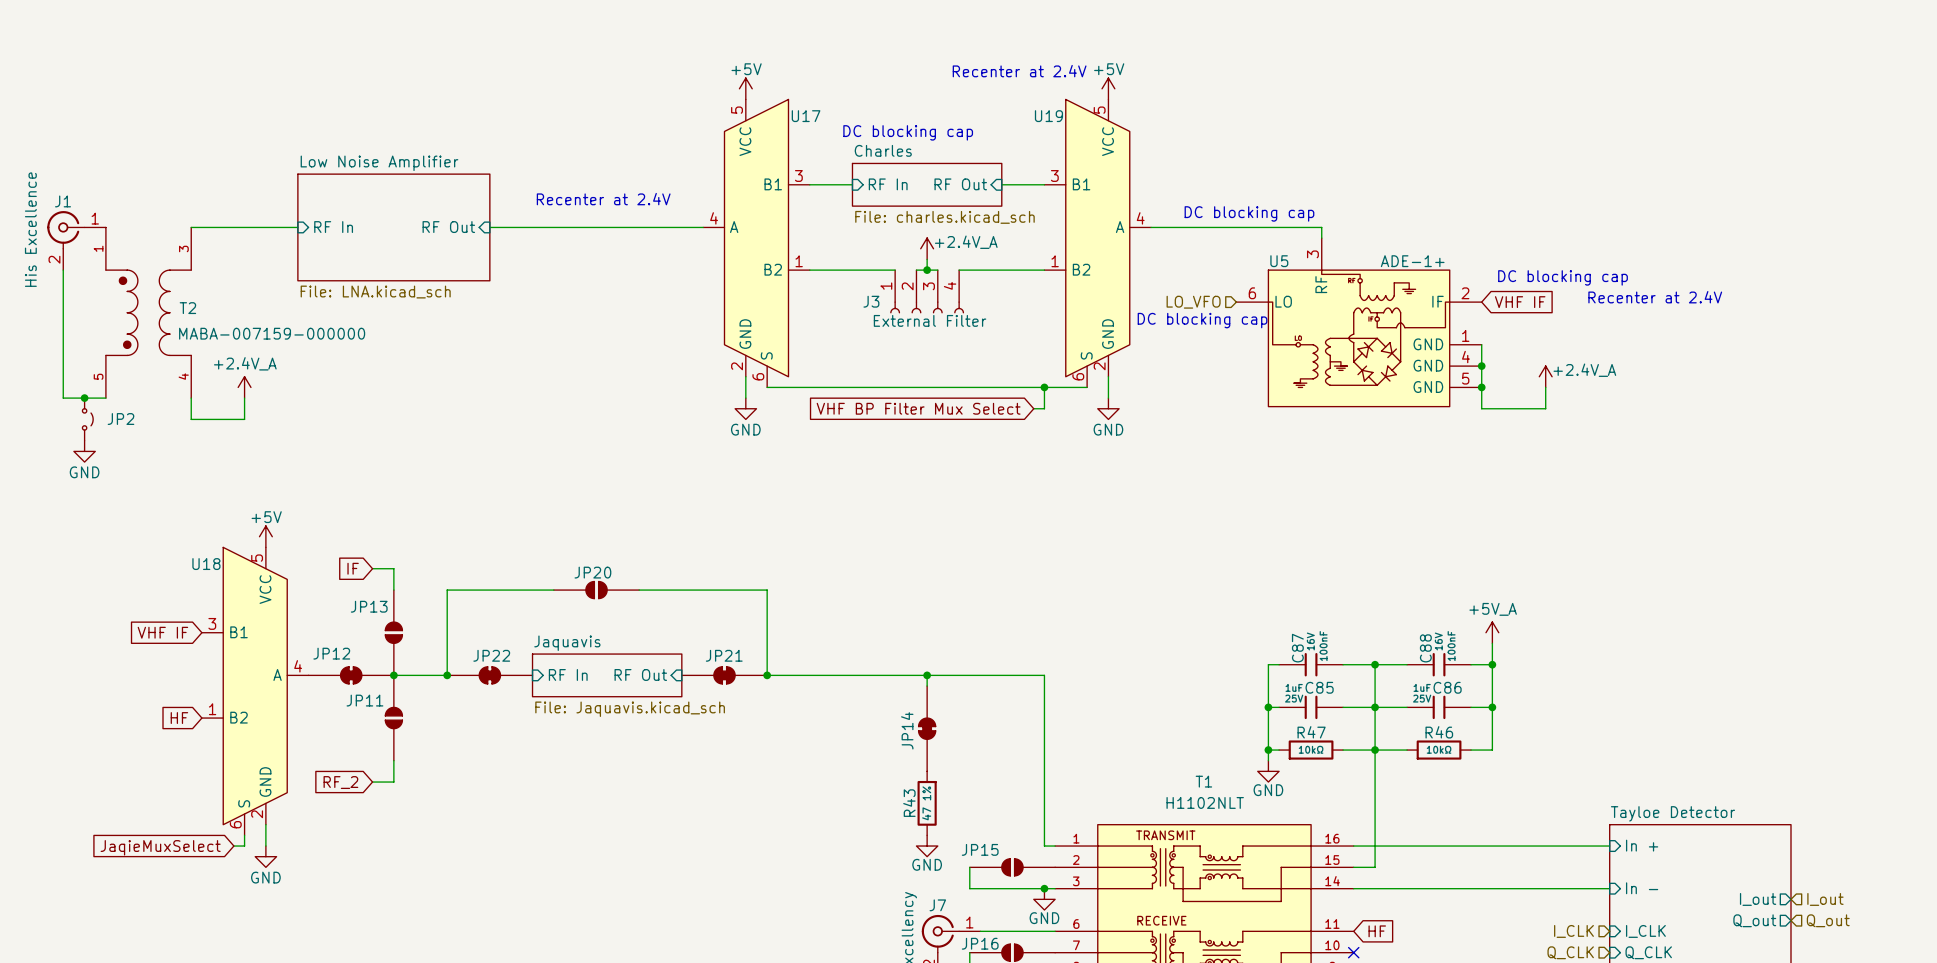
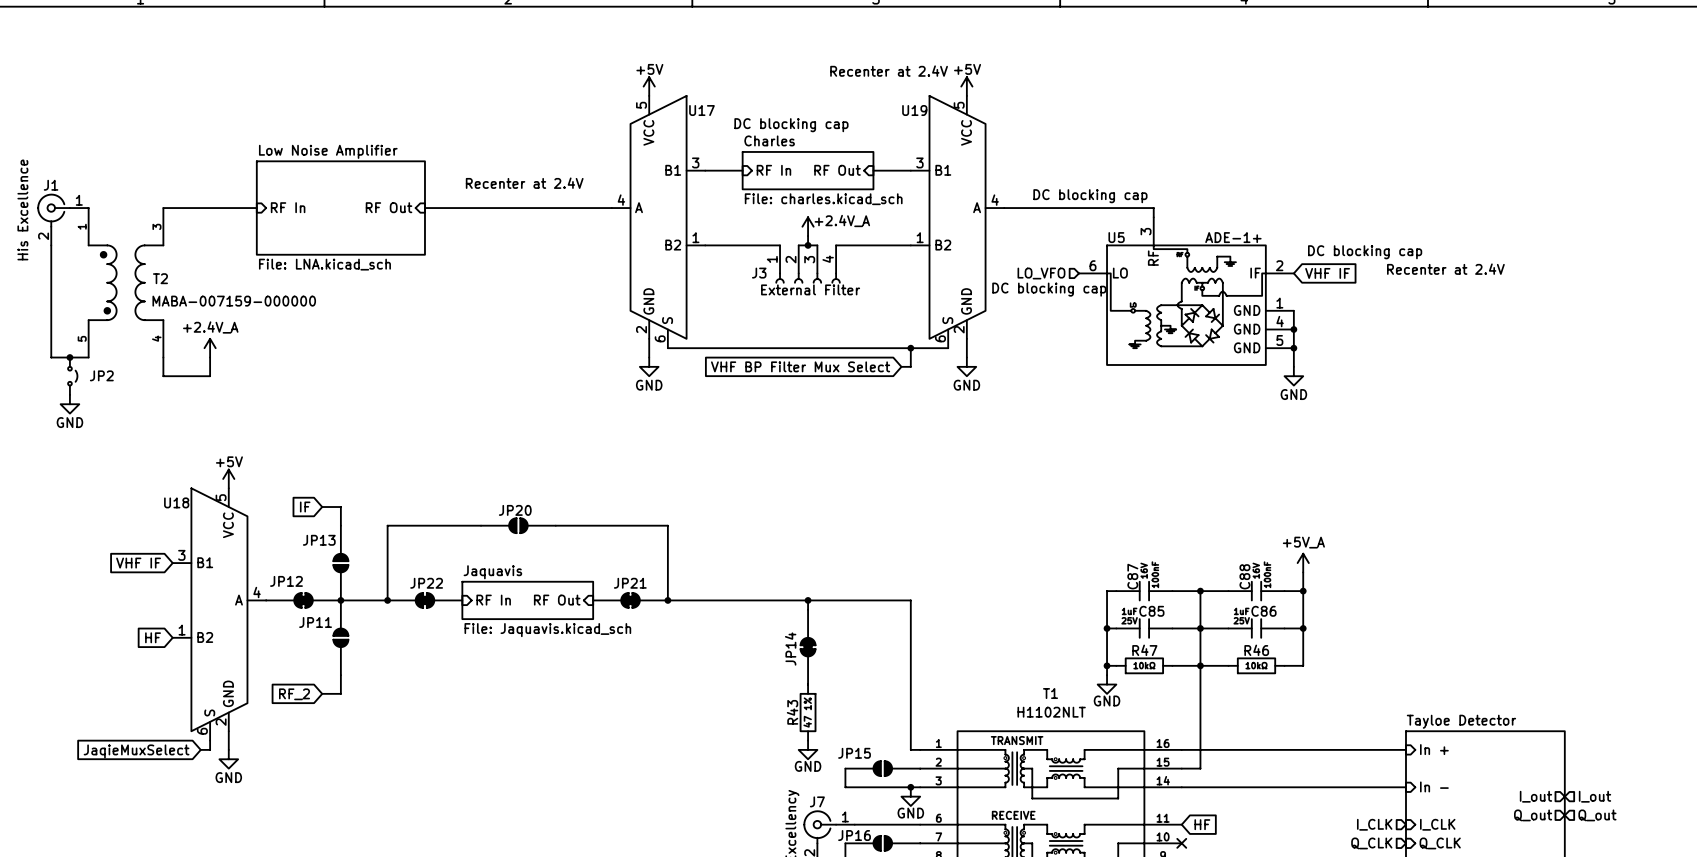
power symbol: +2.4V_A (1545, 376) -> none
wire: (1545, 387) (1545, 408) (1481, 408) -> none
power symbol: none -> GND (1293, 376)

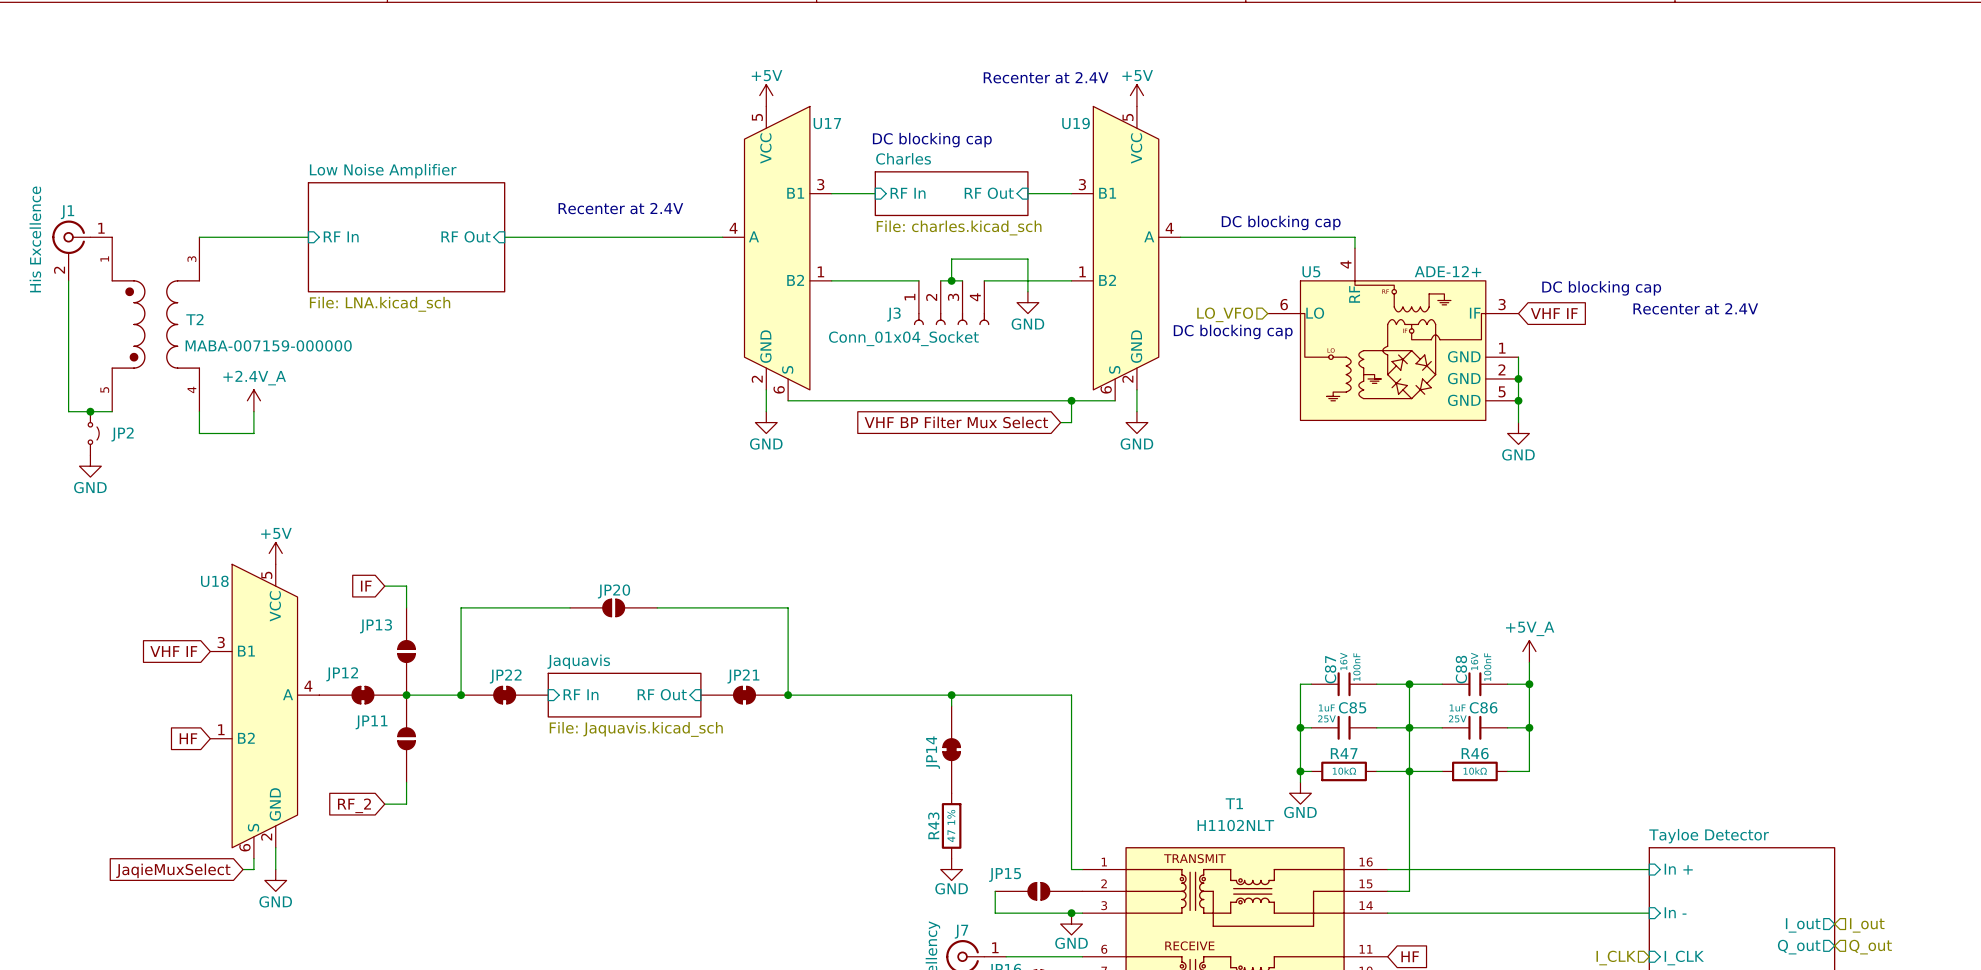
power symbol: +2.4V_A (808, 226) -> none
U5 pin number: 3 (1146, 231) -> 4 (1345, 264)
wire: none -> (951, 269) (951, 259) (1027, 259) (1027, 291)
U5 value: ADE-1+ (1233, 237) -> ADE-12+ (1448, 271)
power symbol: none -> GND (1027, 302)
U5 pin number: 2 (1279, 265) -> 3 (1502, 304)
J3 value: External Filter (810, 289) -> Conn_01x04_Socket (903, 338)
U5 pin number: 4 (1280, 321) -> 2 (1501, 369)

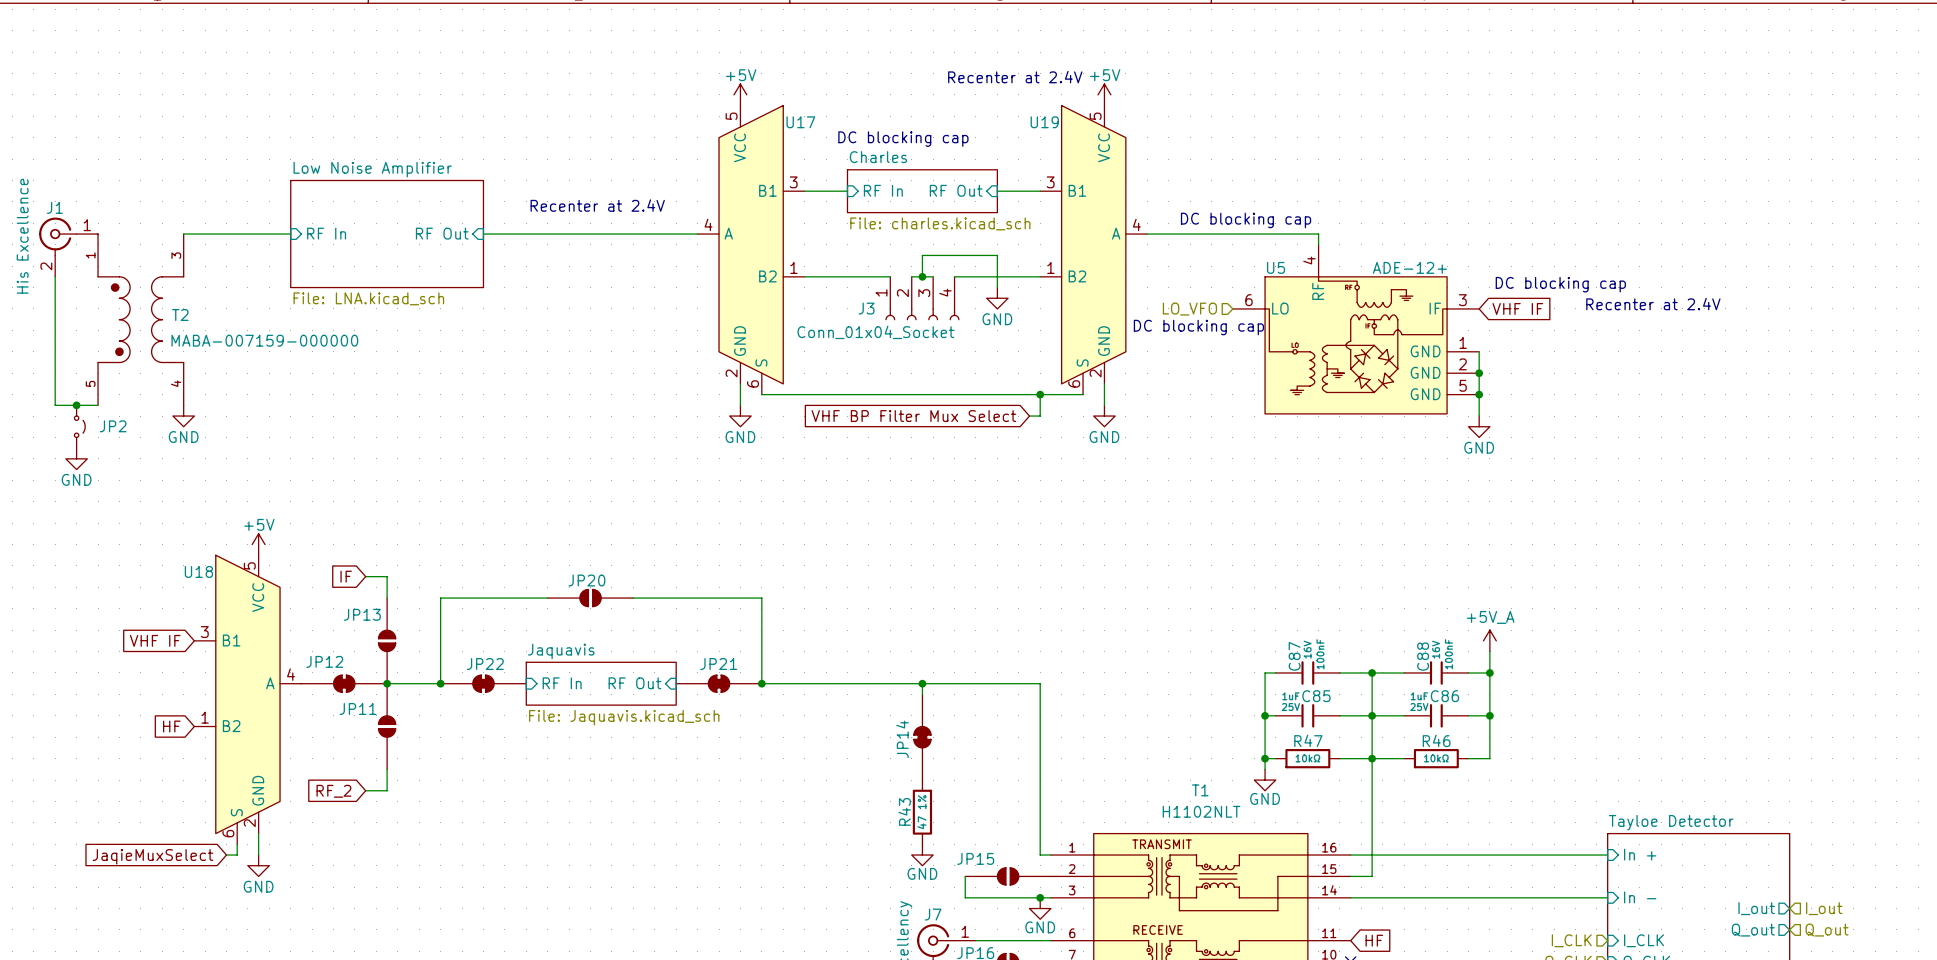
power symbol: +2.4V_A (253, 400) -> none
wire: (199, 411) (199, 433) (253, 433) (253, 411) -> none
power symbol: none -> GND (183, 416)

